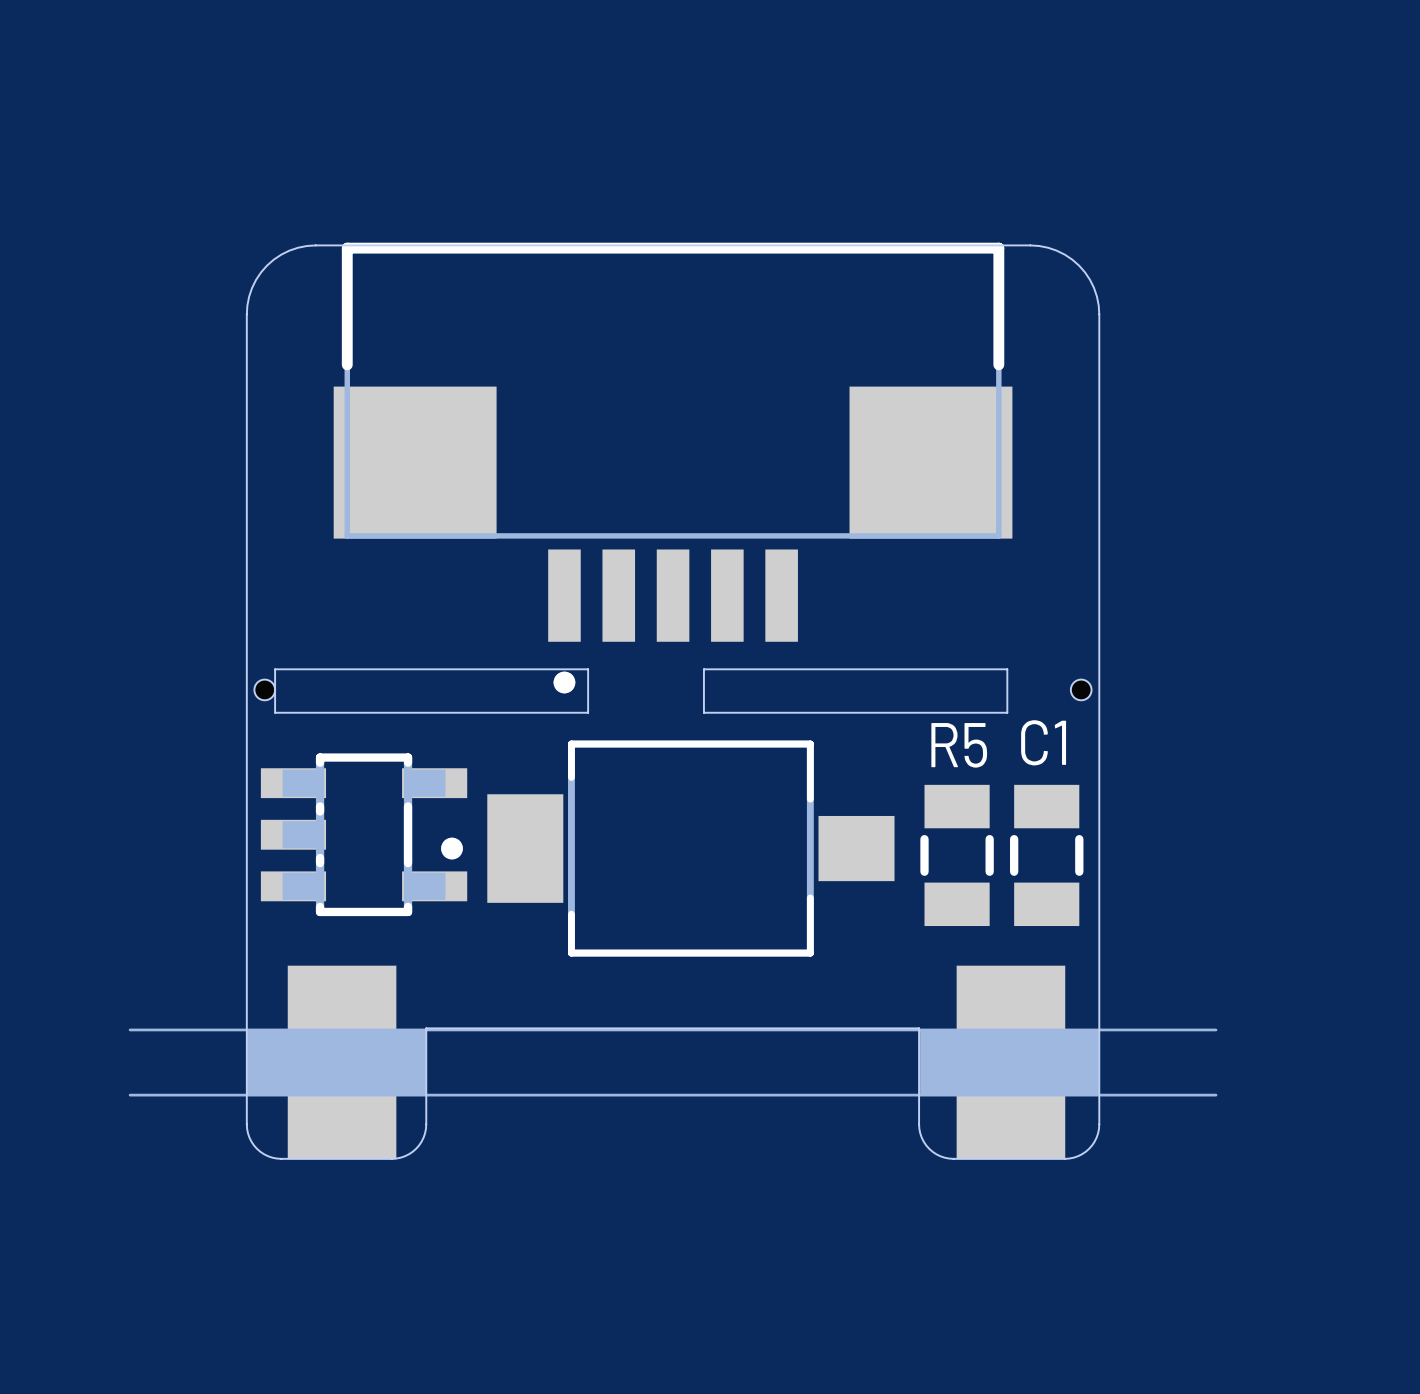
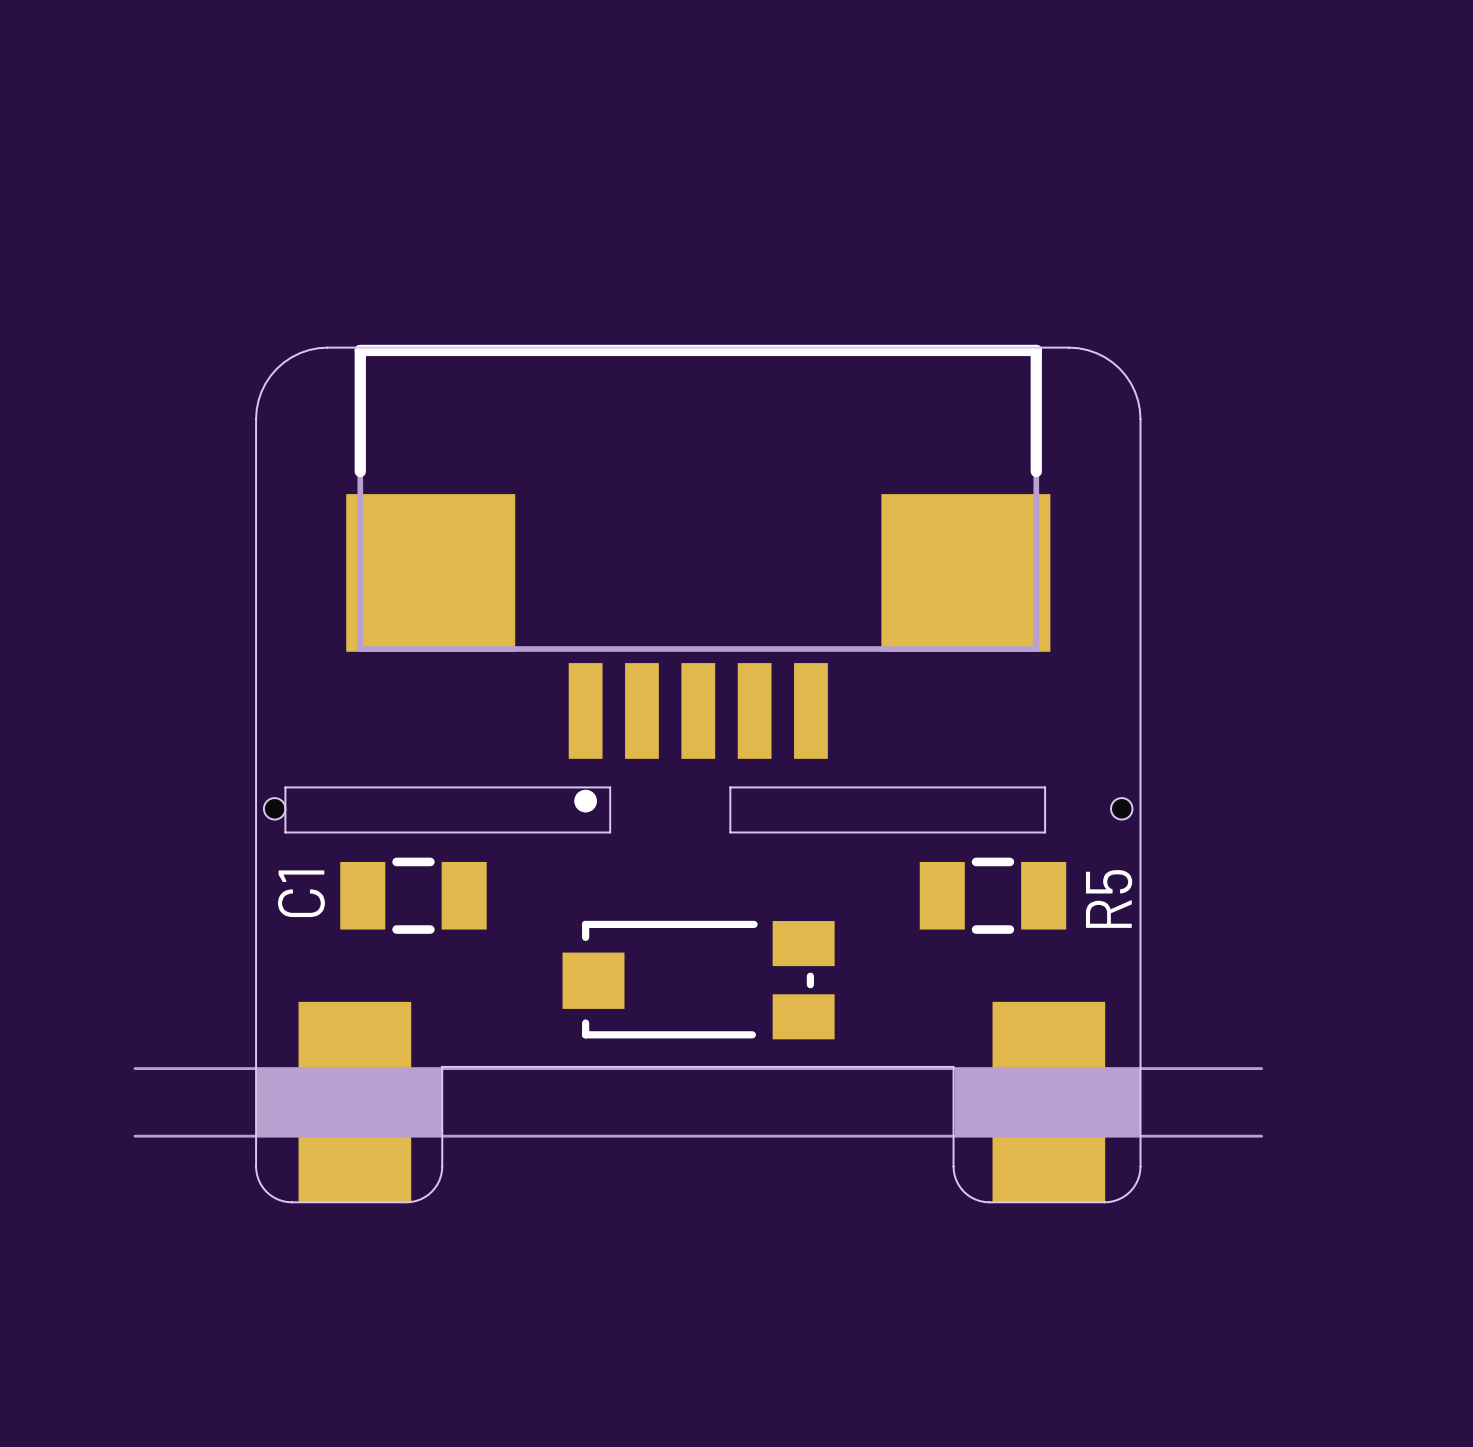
board edge: (246, 404) (246, 314) (252, 287) (261, 272) (281, 254) (297, 247) (315, 245) (1030, 245) (1048, 247) (1064, 254) (1079, 265) (1090, 279) (1096, 296) (1099, 314) (1099, 404) -> (256, 419) (261, 391) (277, 368) (300, 353) (327, 347) (1078, 348) (1104, 357) (1125, 375) (1138, 400) (1140, 419)
part position: (673, 468) -> (698, 578)
board edge: (275, 669) (275, 712) (588, 712) (588, 669) (275, 669) -> (285, 787) (285, 832) (610, 832) (610, 787) (285, 787)
board edge: (703, 669) (1007, 669) (1007, 712) (703, 712) (703, 669) -> (730, 787) (1045, 787) (1045, 832) (730, 832) (730, 787)
hole position: (264, 689) -> (274, 808)
hole position: (1081, 689) -> (1121, 808)
C1 name position: C1 (1043, 742) -> C1 (301, 893)
part: (364, 834) -> none
part: (667, 848) -> none
R5 rotation: 0° (957, 855) -> 90° clockwise (992, 895)
C1 rotation: 0° (1046, 855) -> 90° clockwise (413, 895)
C1 position: (1046, 855) -> (413, 895)
part: none -> (698, 980)

